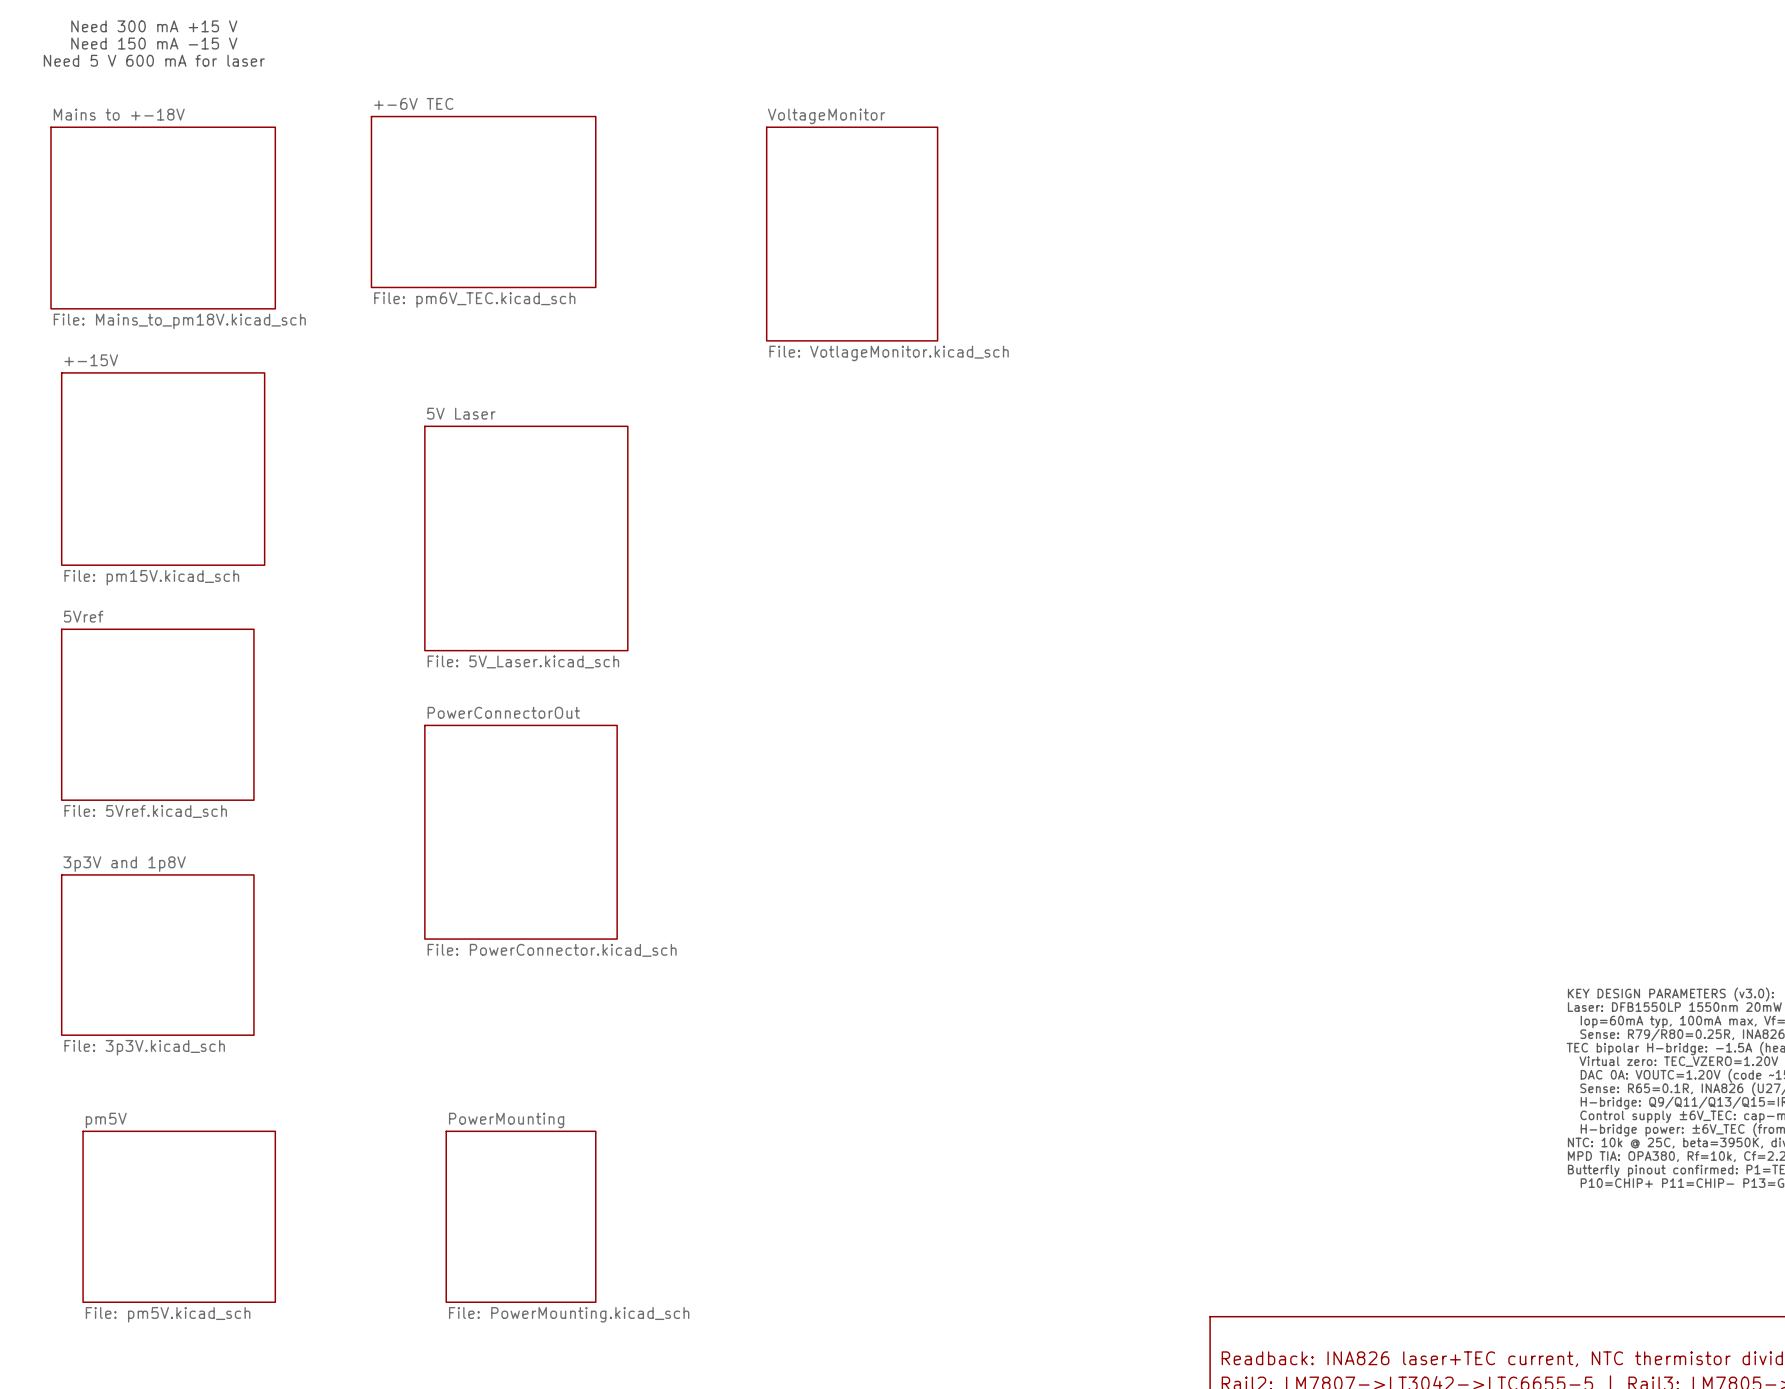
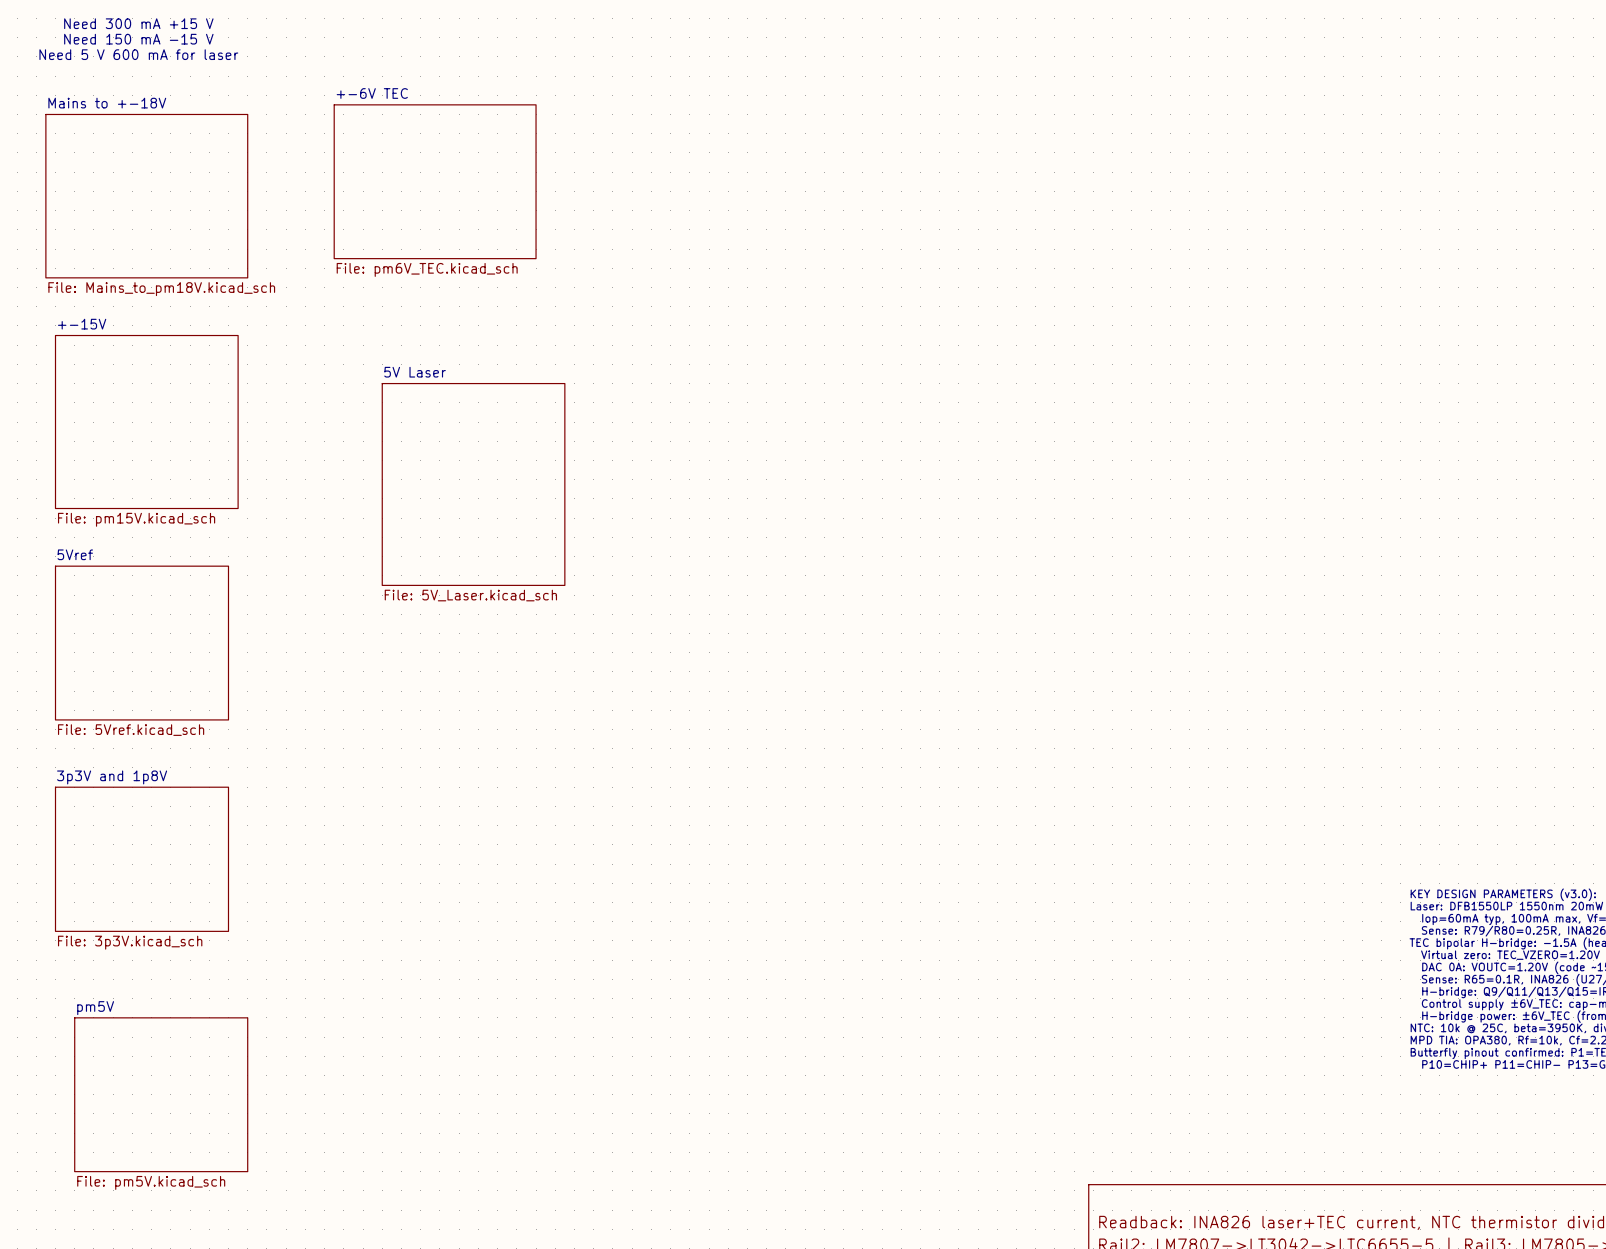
sheet VoltageMonitor: File: VotlageMonitor.kicad_sch (852, 234) -> none
sheet PowerConnectorOut: File: PowerConnector.kicad_sch (521, 832) -> none
sheet PowerMounting: File: PowerMounting.kicad_sch (521, 1216) -> none

